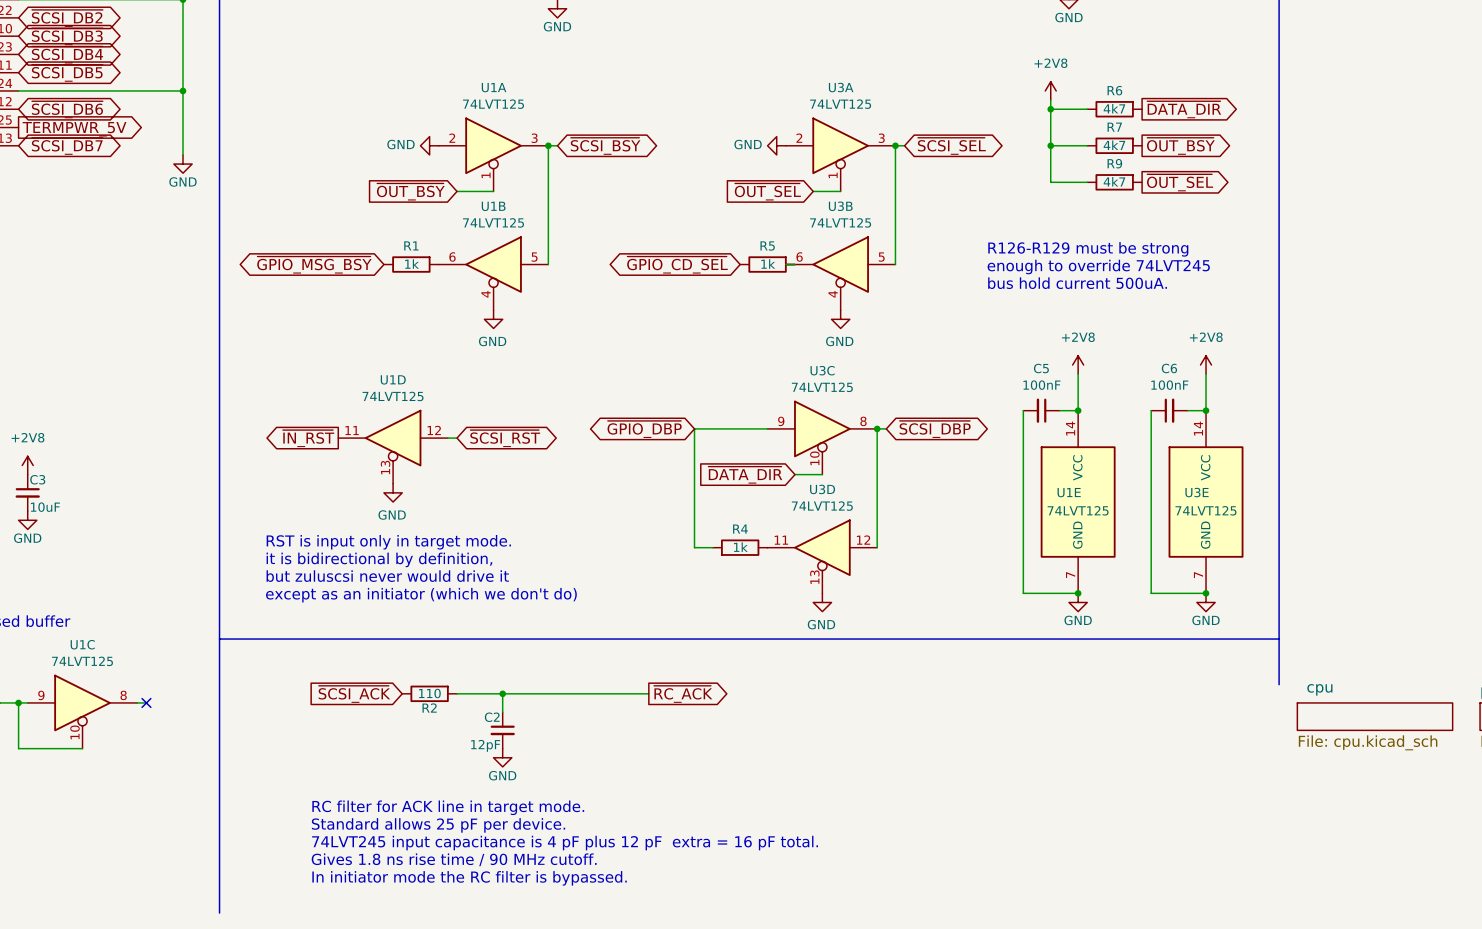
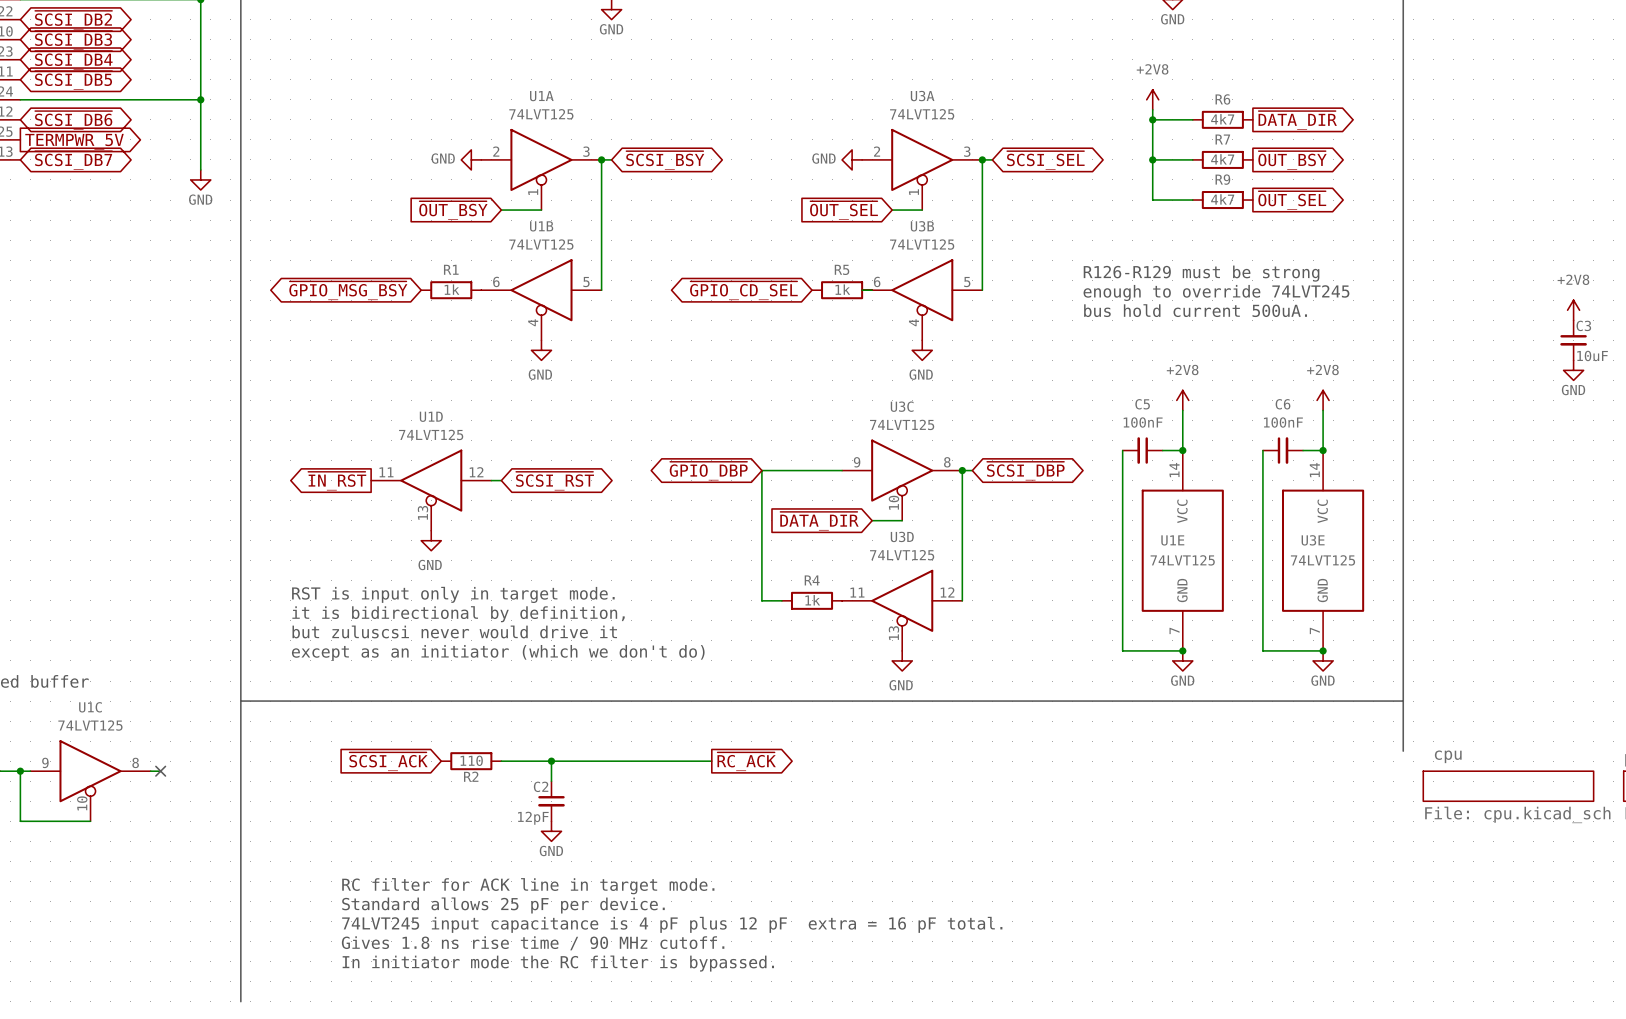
power symbol: none -> +2V8 (1573, 310)
power symbol: none -> GND (1573, 370)
power symbol: +2V8 (27, 465) -> none
C3 position: (27, 492) -> (1573, 340)
power symbol: GND (27, 520) -> none

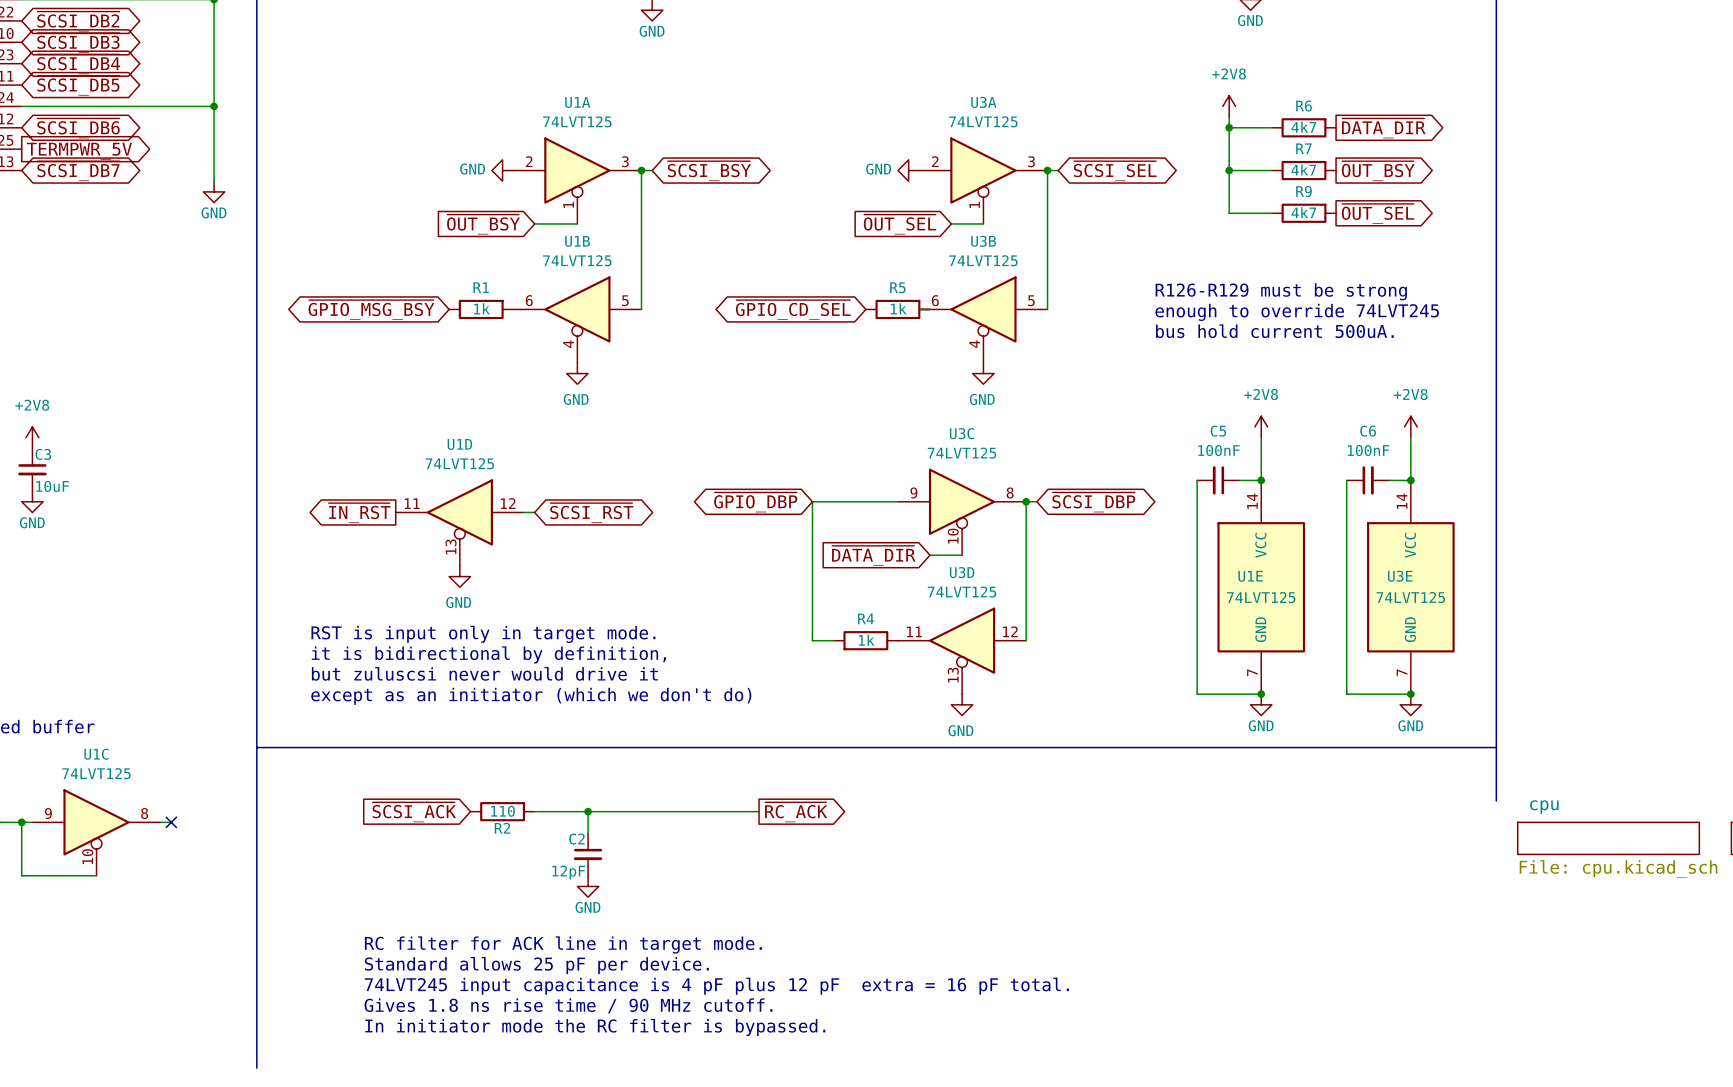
power symbol: +2V8 (1573, 310) -> none
C3 position: (1573, 340) -> (32, 469)
power symbol: GND (1573, 370) -> none
power symbol: none -> +2V8 (32, 437)
power symbol: none -> GND (32, 501)

